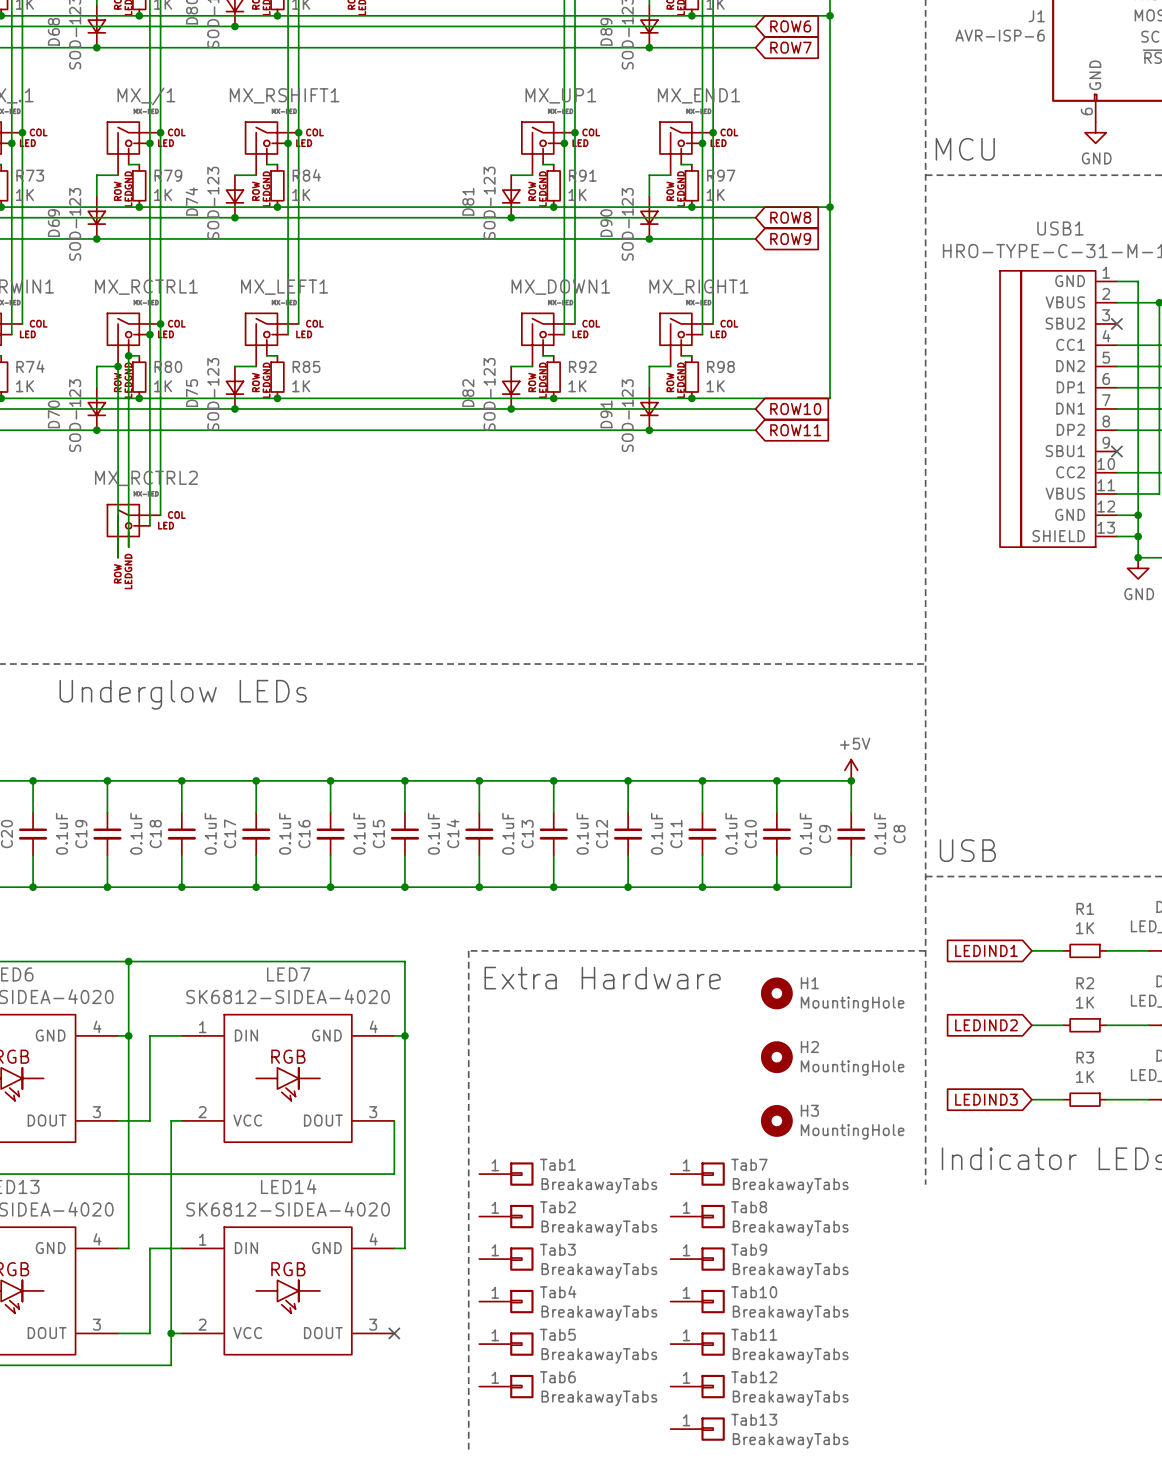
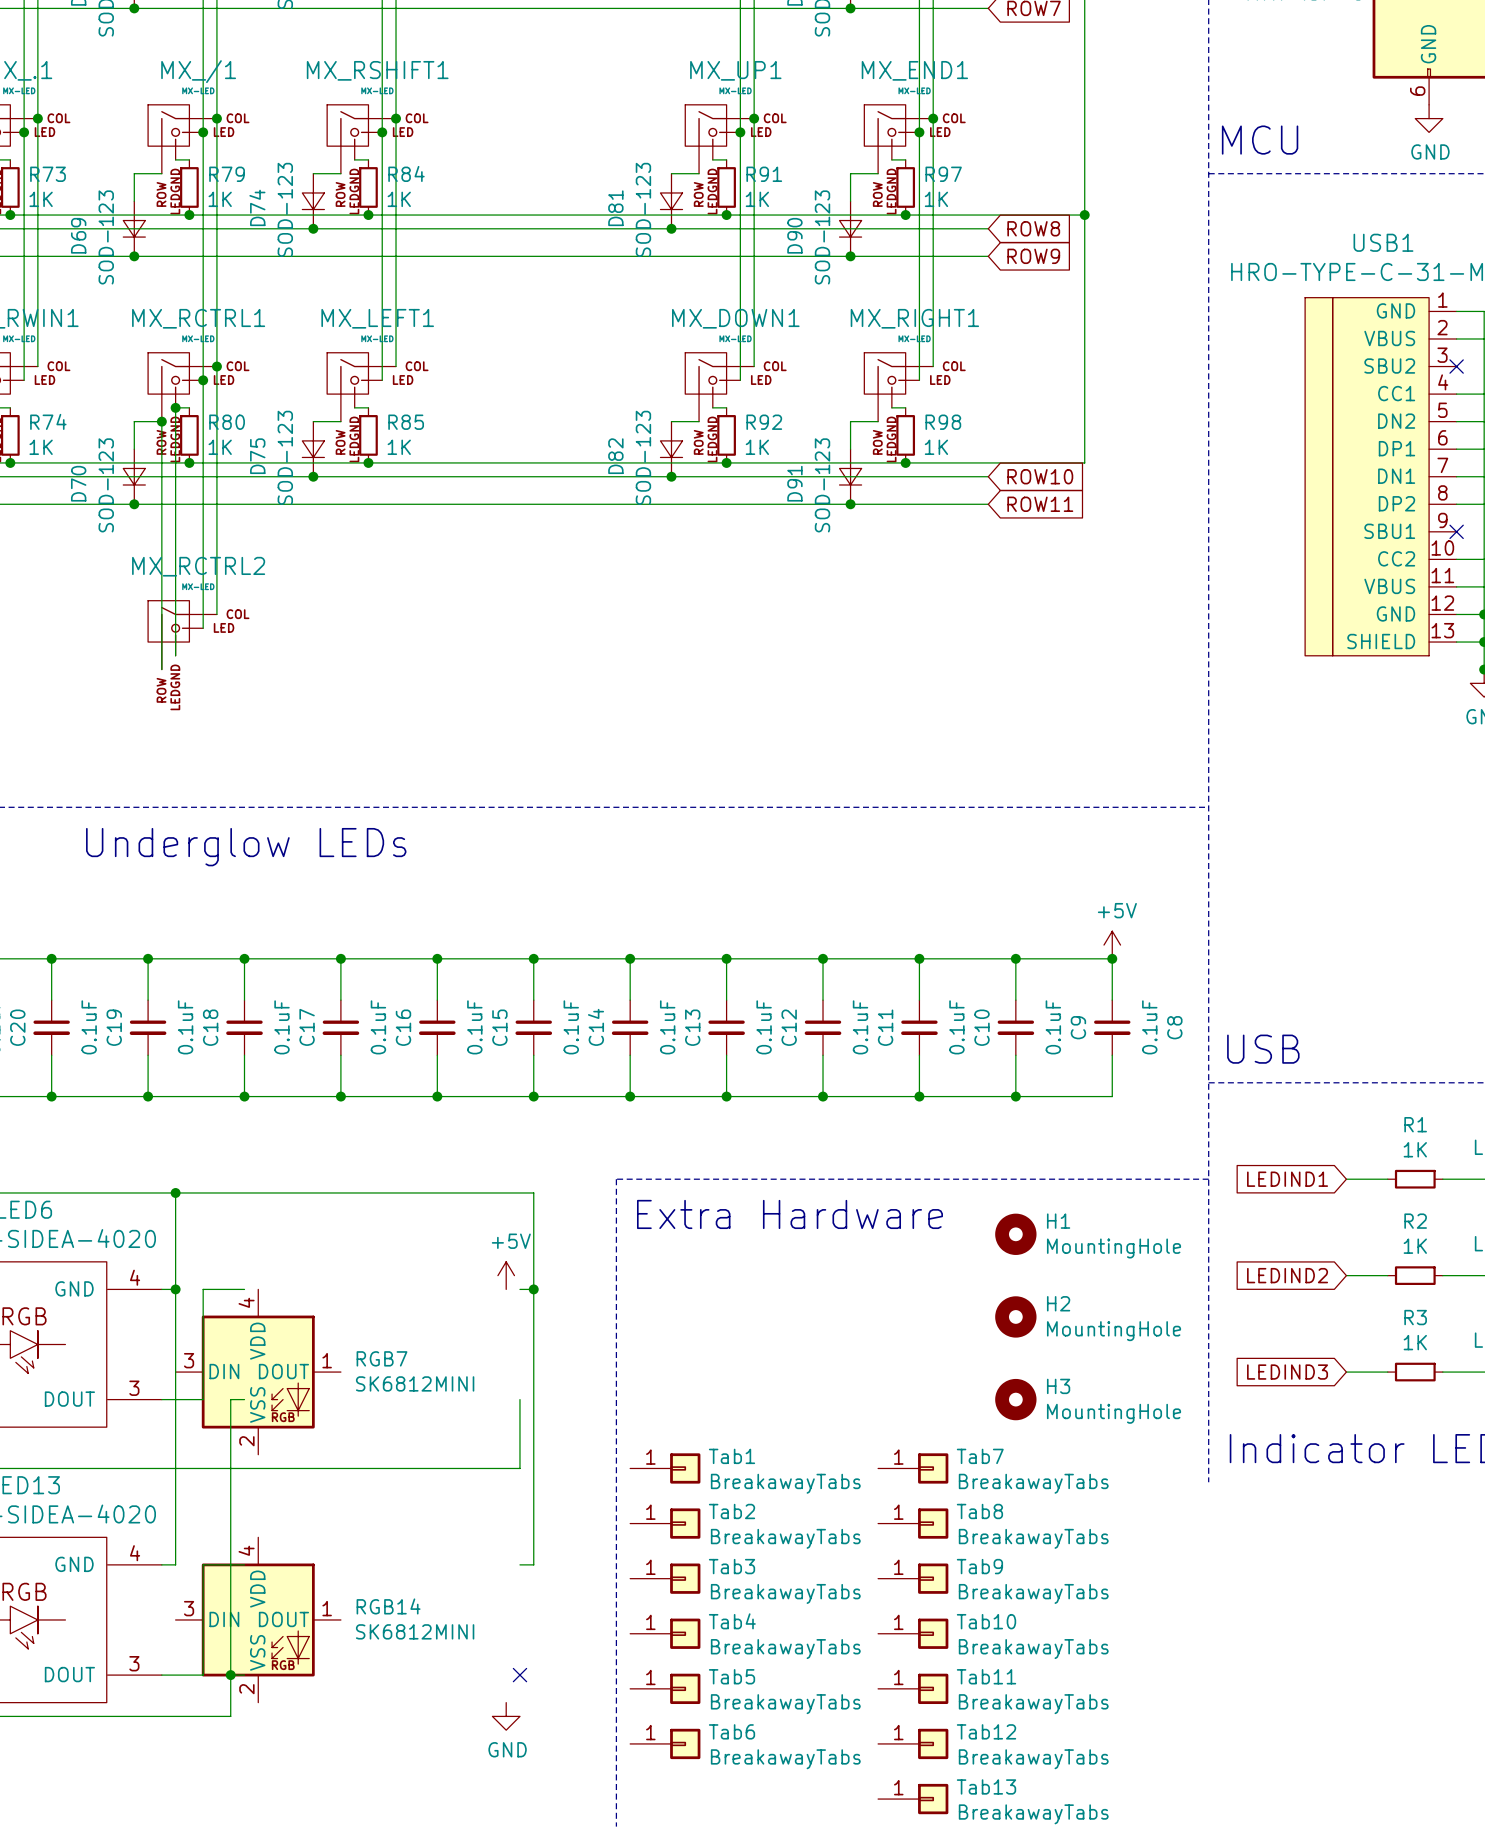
power symbol: none -> +5V (506, 1275)
LED7: SK6812-SIDEA-4020 (288, 1078) -> none
RGB7: none -> SK6812MINI (258, 1372)
RGB14: none -> SK6812MINI (258, 1619)
LED14: SK6812-SIDEA-4020 (288, 1290) -> none
power symbol: none -> GND (506, 1716)

